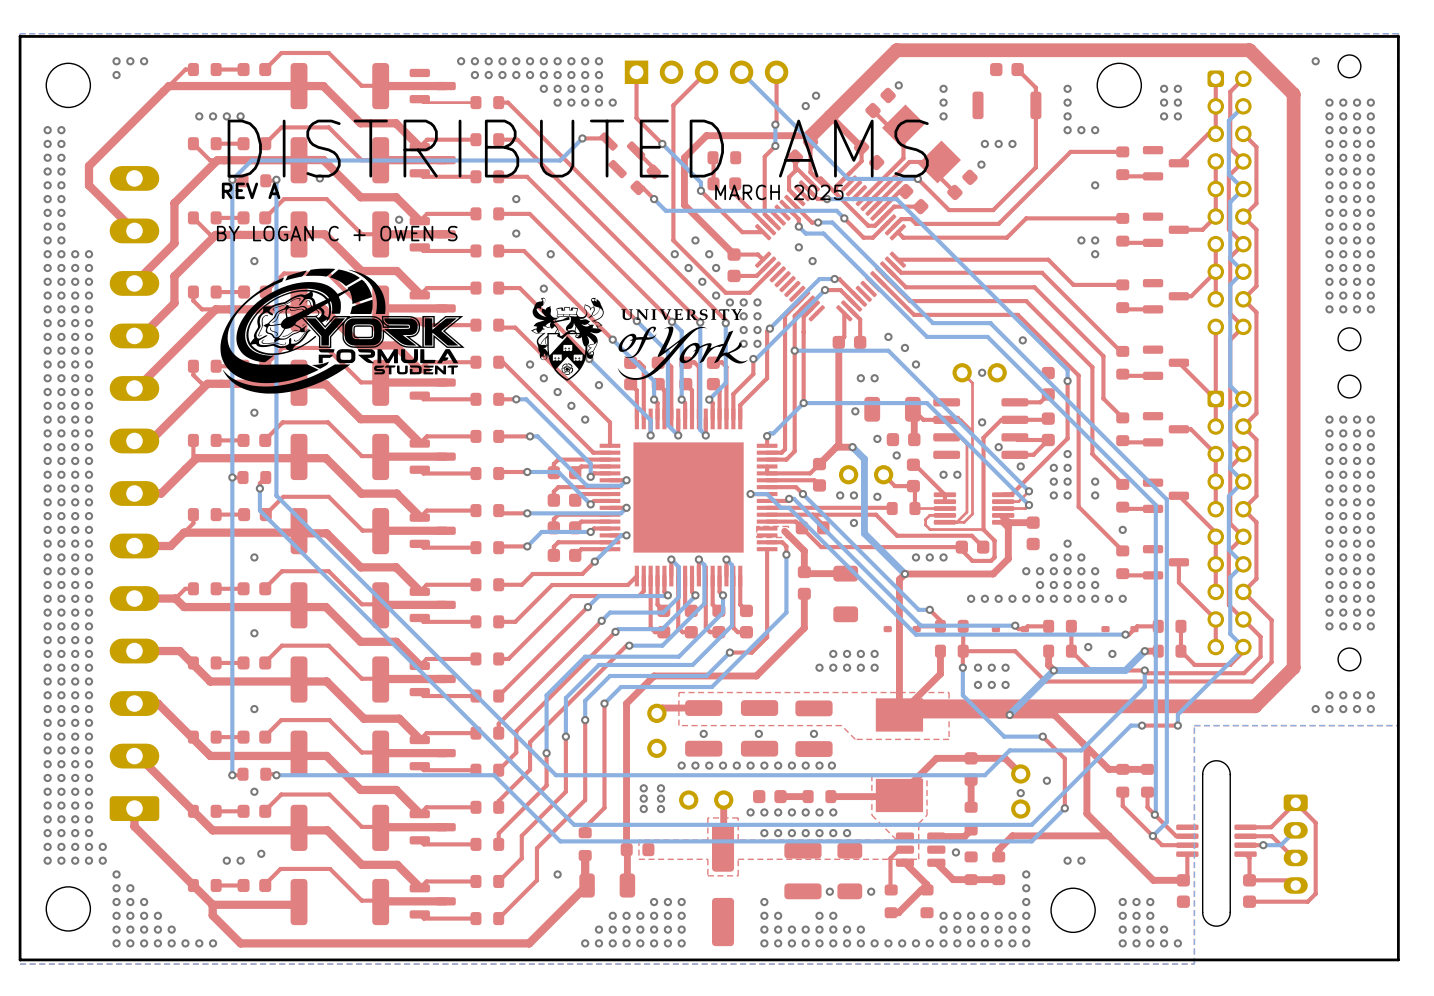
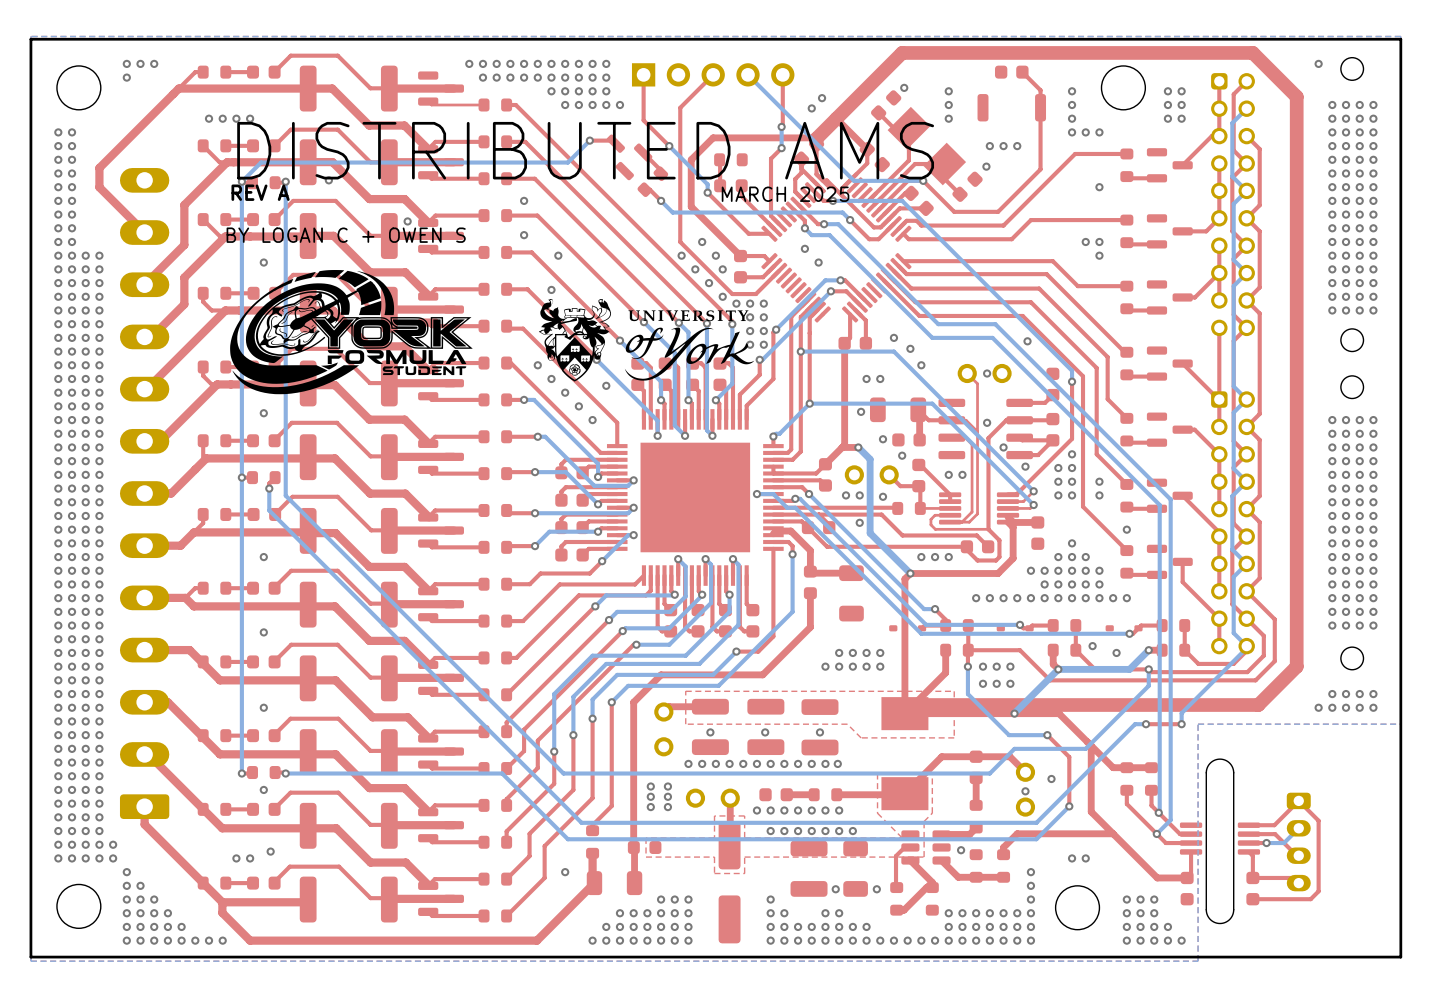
top zone outline: (788, 526) (756, 526) (756, 537) (788, 537) (788, 526) -> none
top track: none -> (790, 531) (776, 531) (773, 533)

